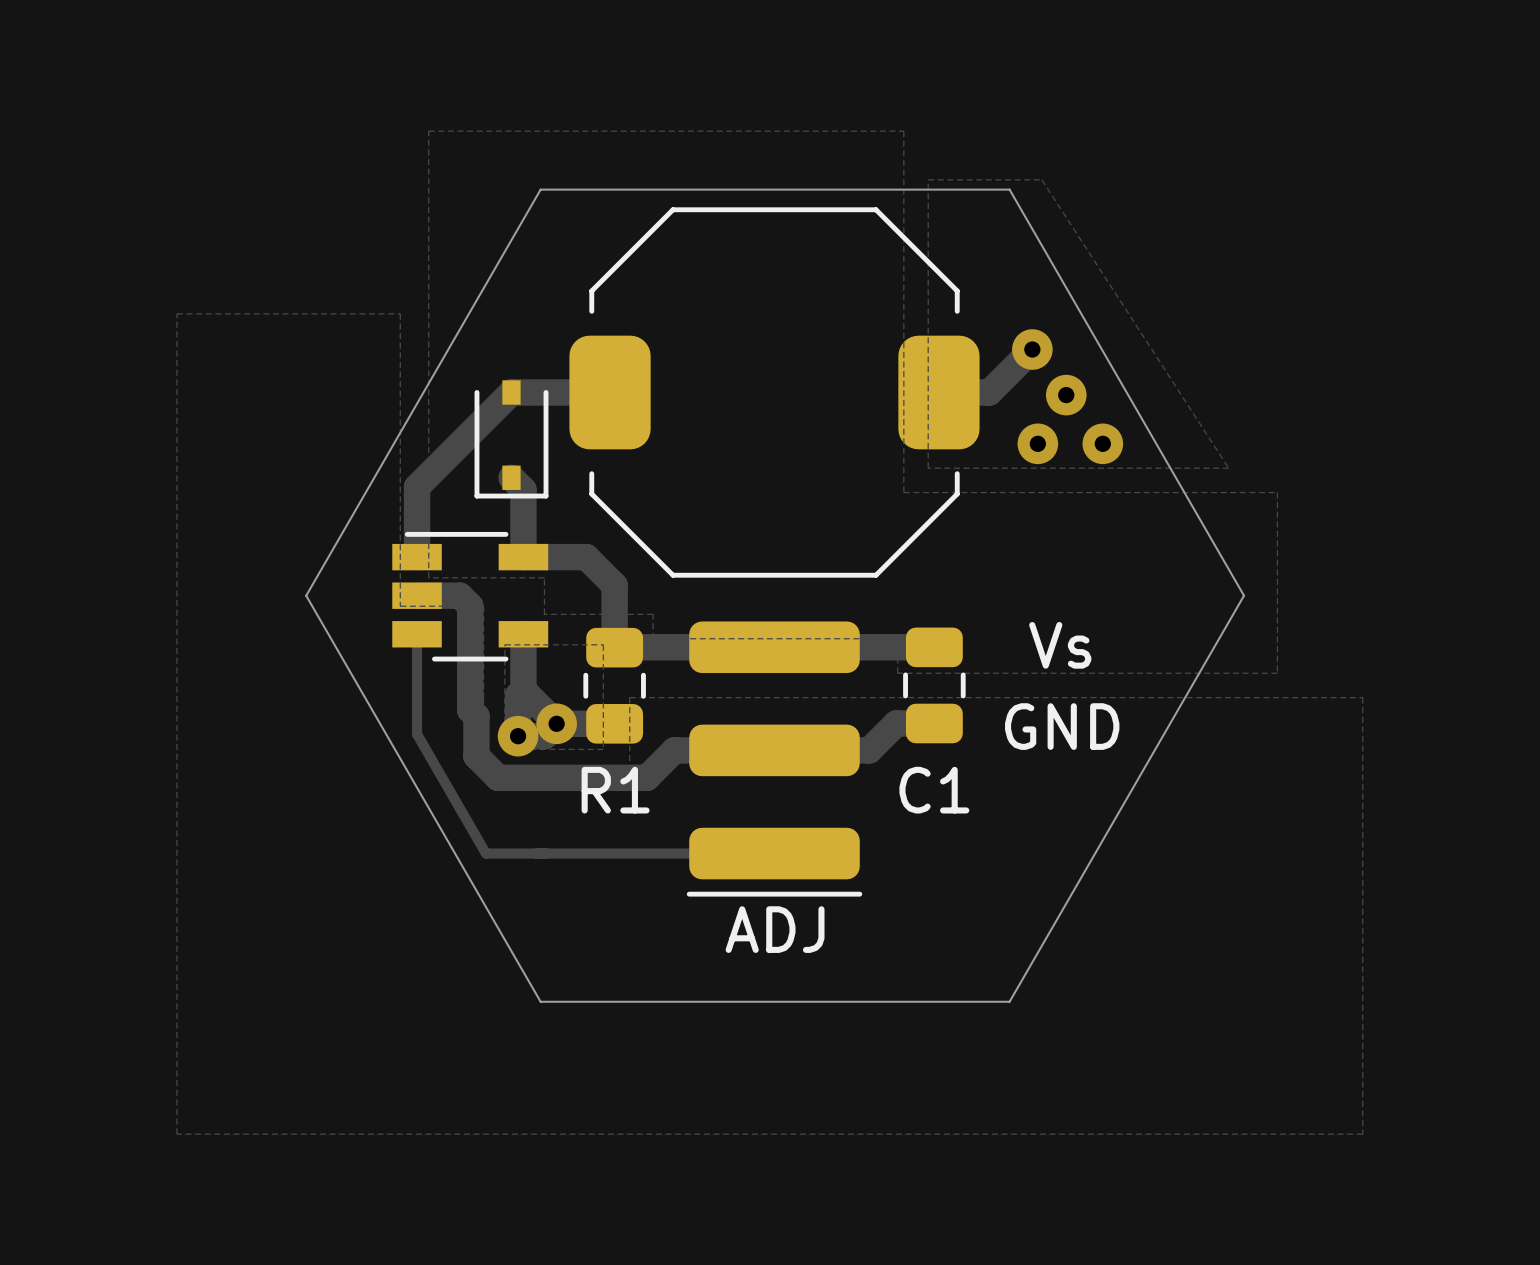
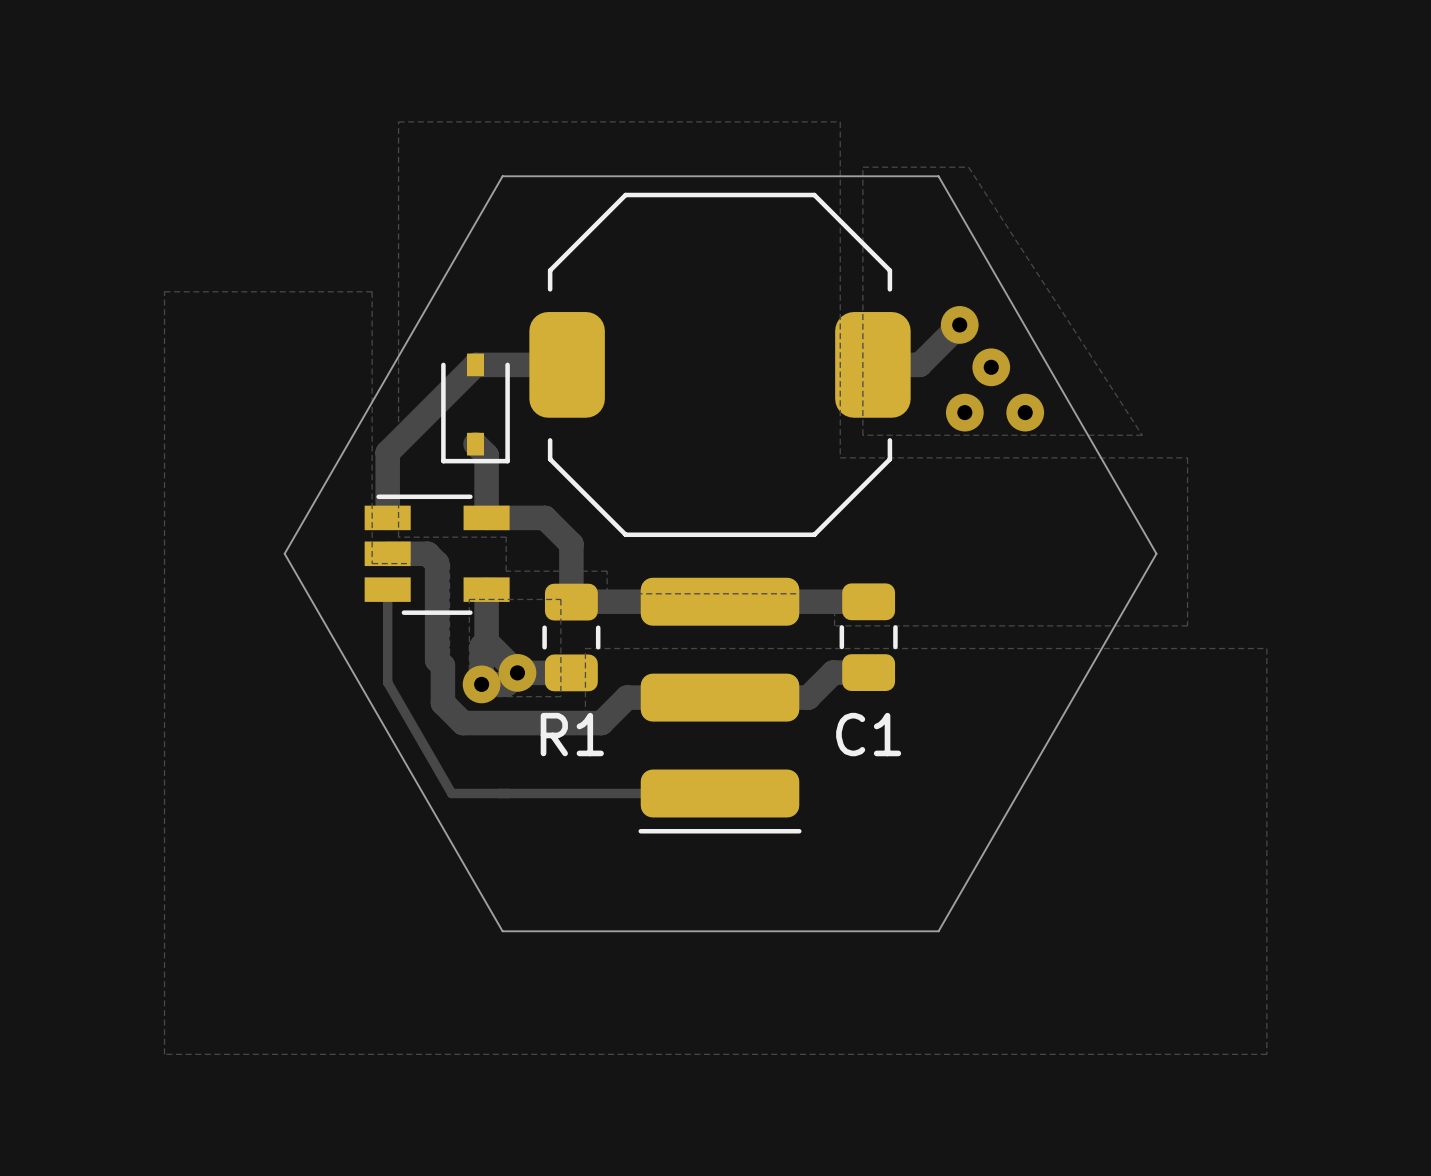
text: Vs (1060, 645) -> none
text: GND (1062, 726) -> none
text: ADJ (775, 929) -> none

